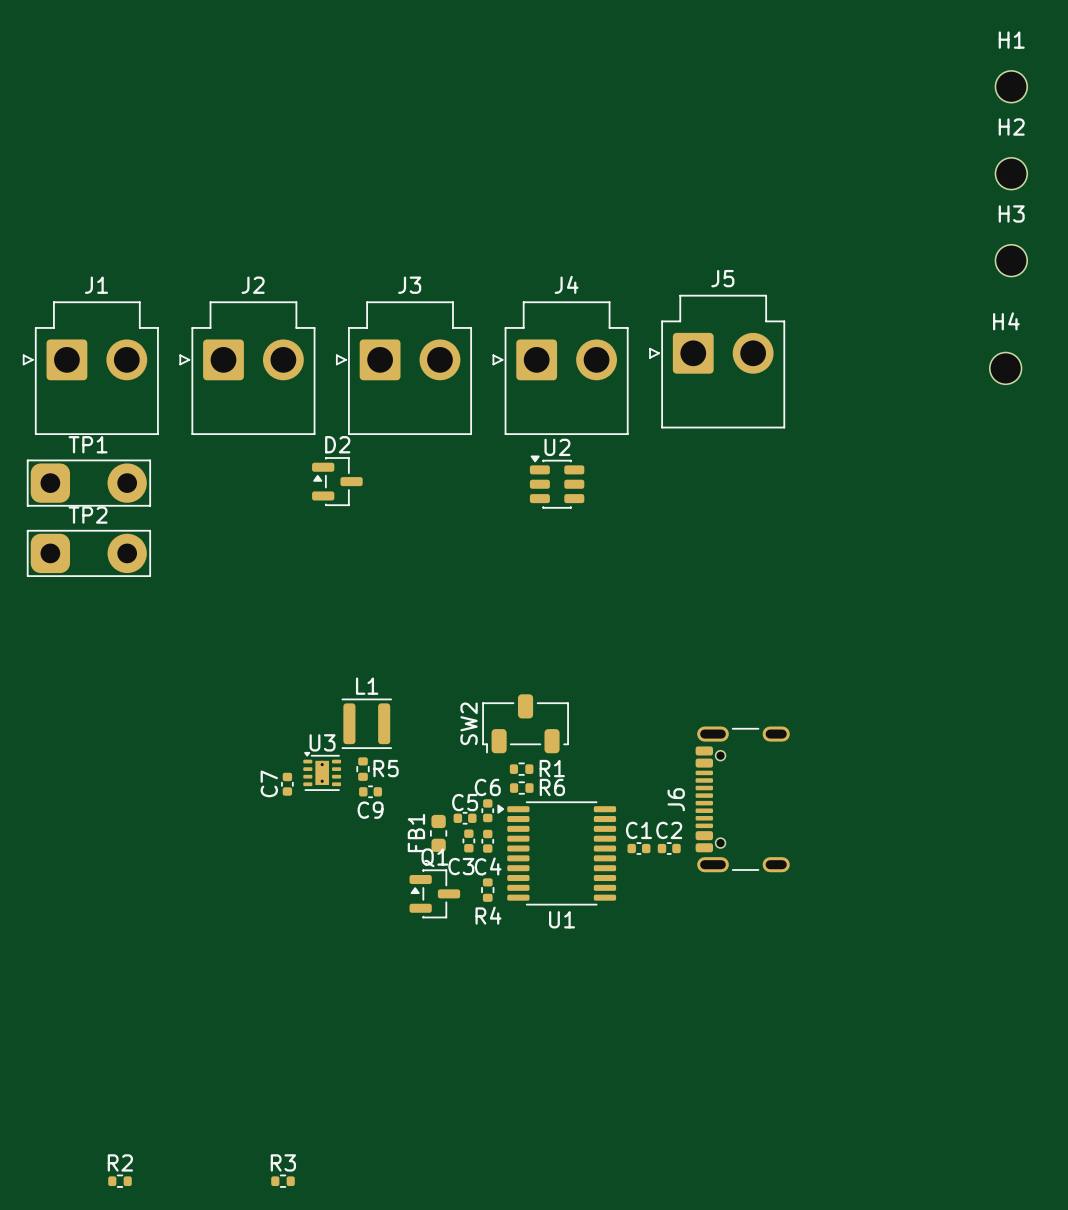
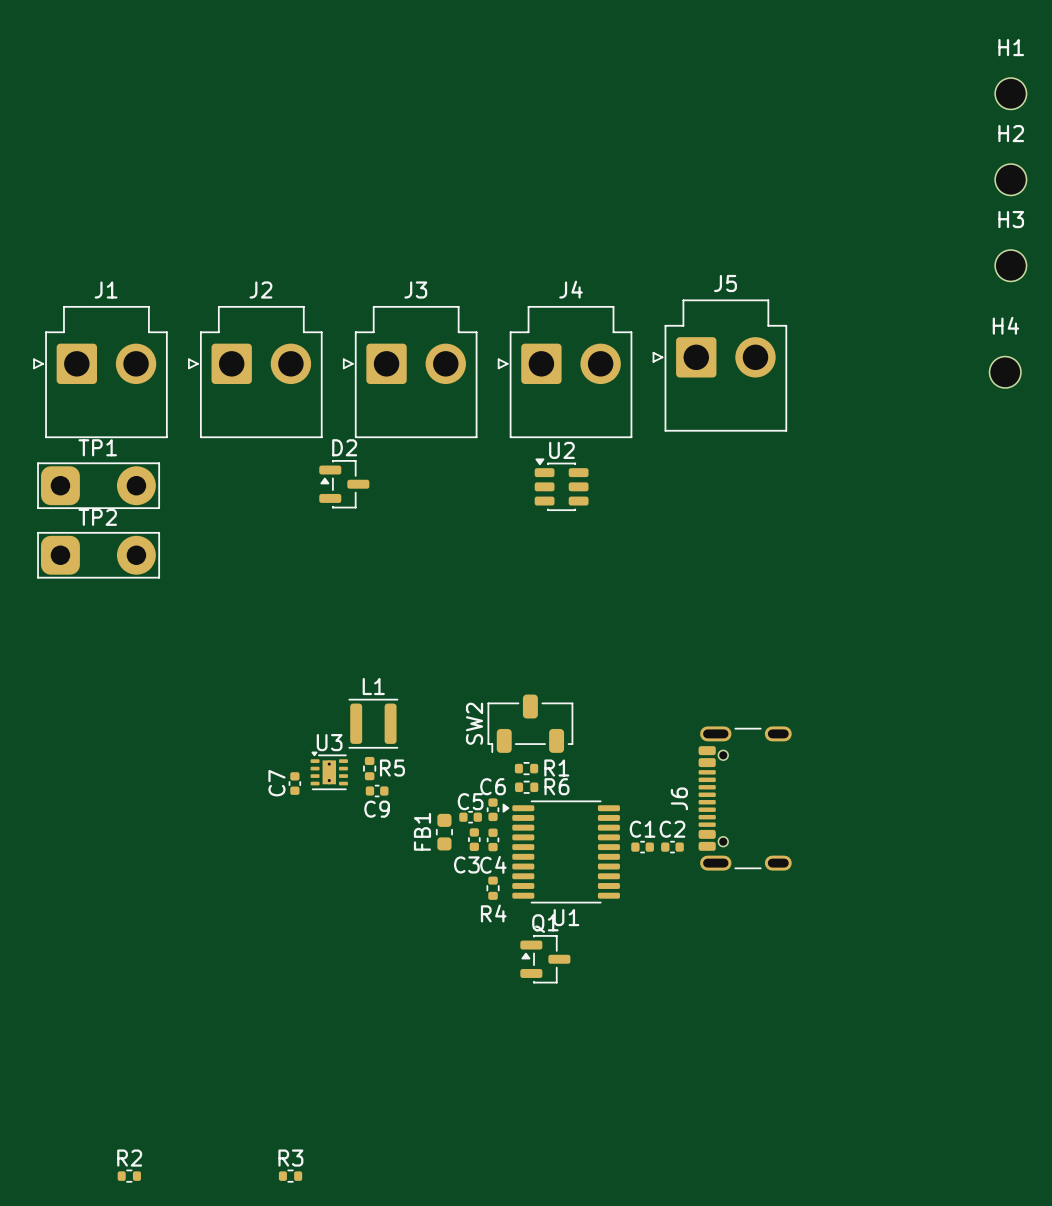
Q1 position: (434, 893) -> (545, 959)

